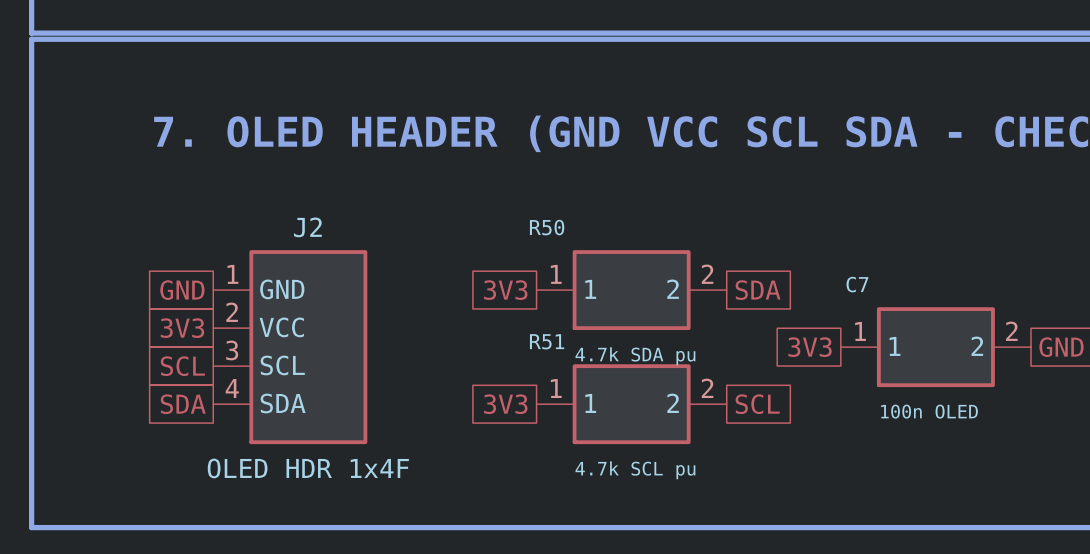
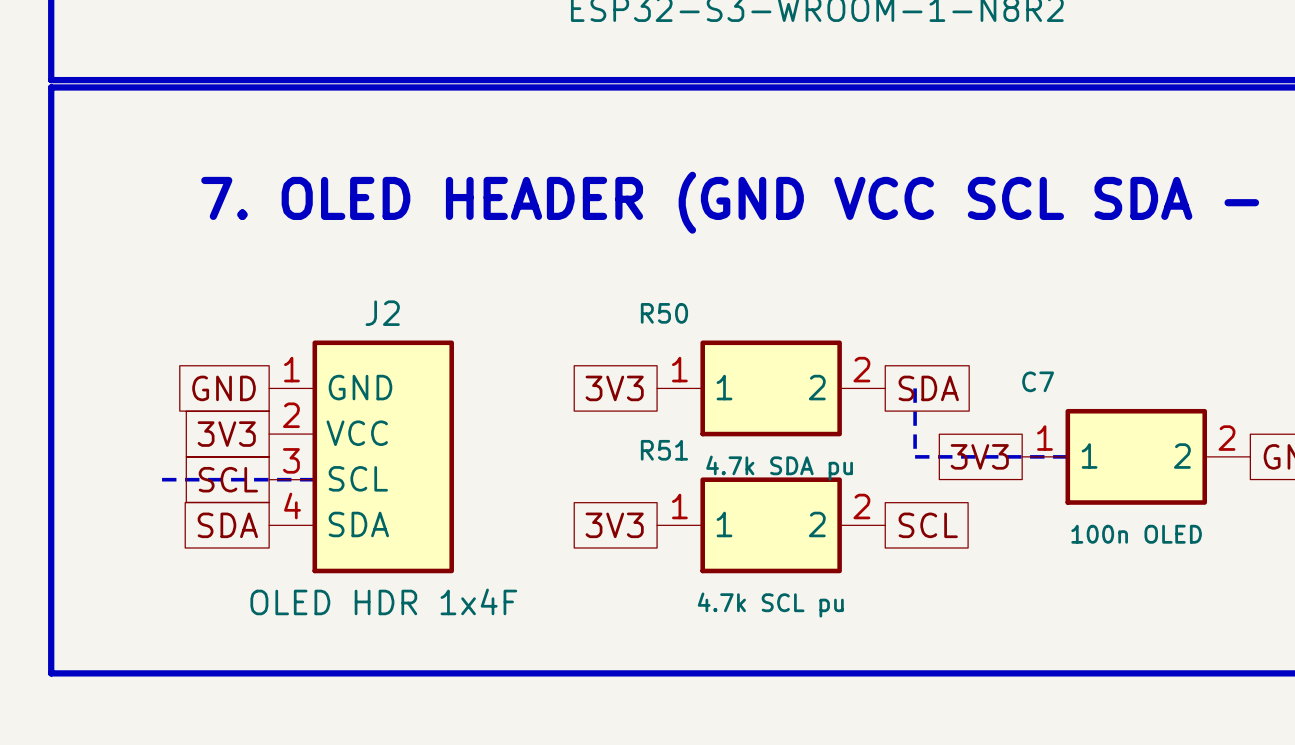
line: none -> (915, 388) (915, 456) (1067, 456)
line: none -> (162, 479) (314, 479)
R51 value position: 4.7k SCL pu (635, 470) -> 4.7k SCL pu (770, 605)

